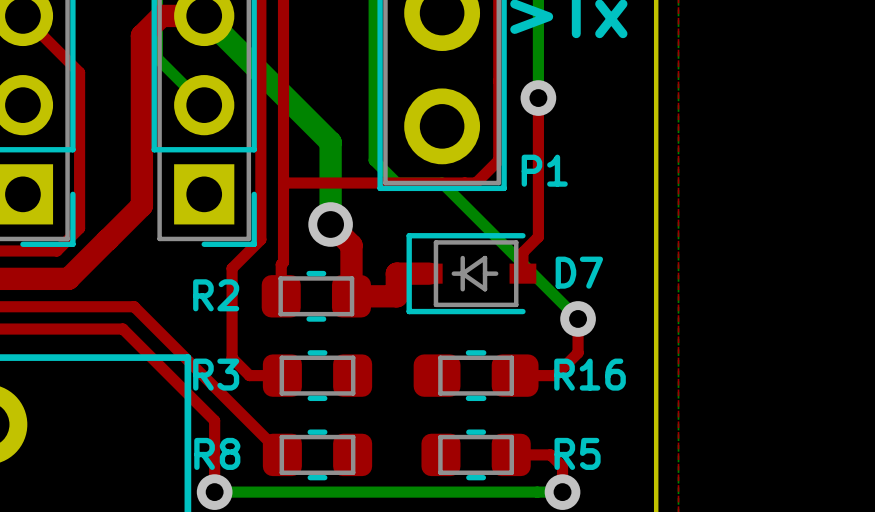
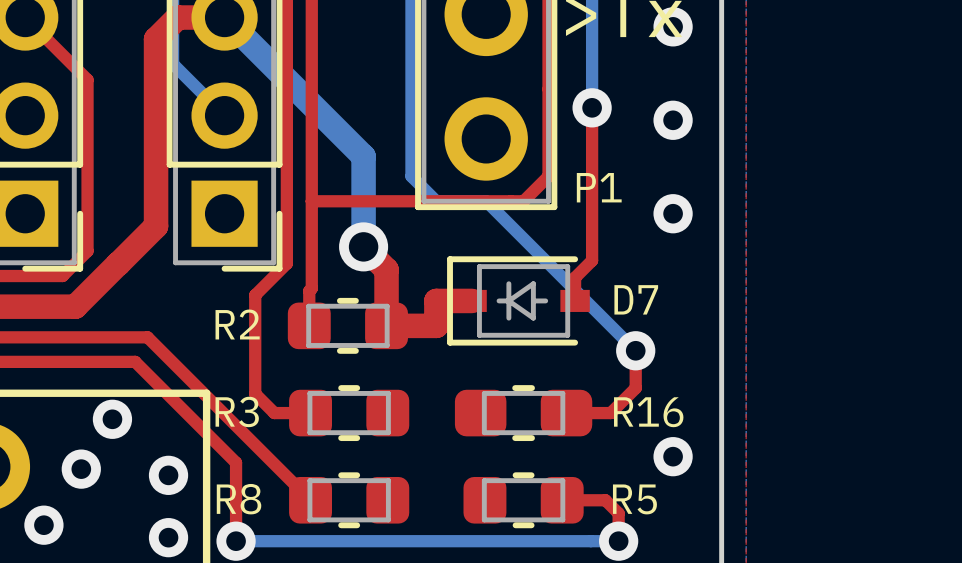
via: none -> (673, 26)
via: none -> (673, 120)
via: none -> (673, 213)
via: none -> (112, 419)
via: none -> (673, 456)
via: none -> (81, 469)
via: none -> (168, 475)
via: none -> (43, 525)
via: none -> (168, 537)

